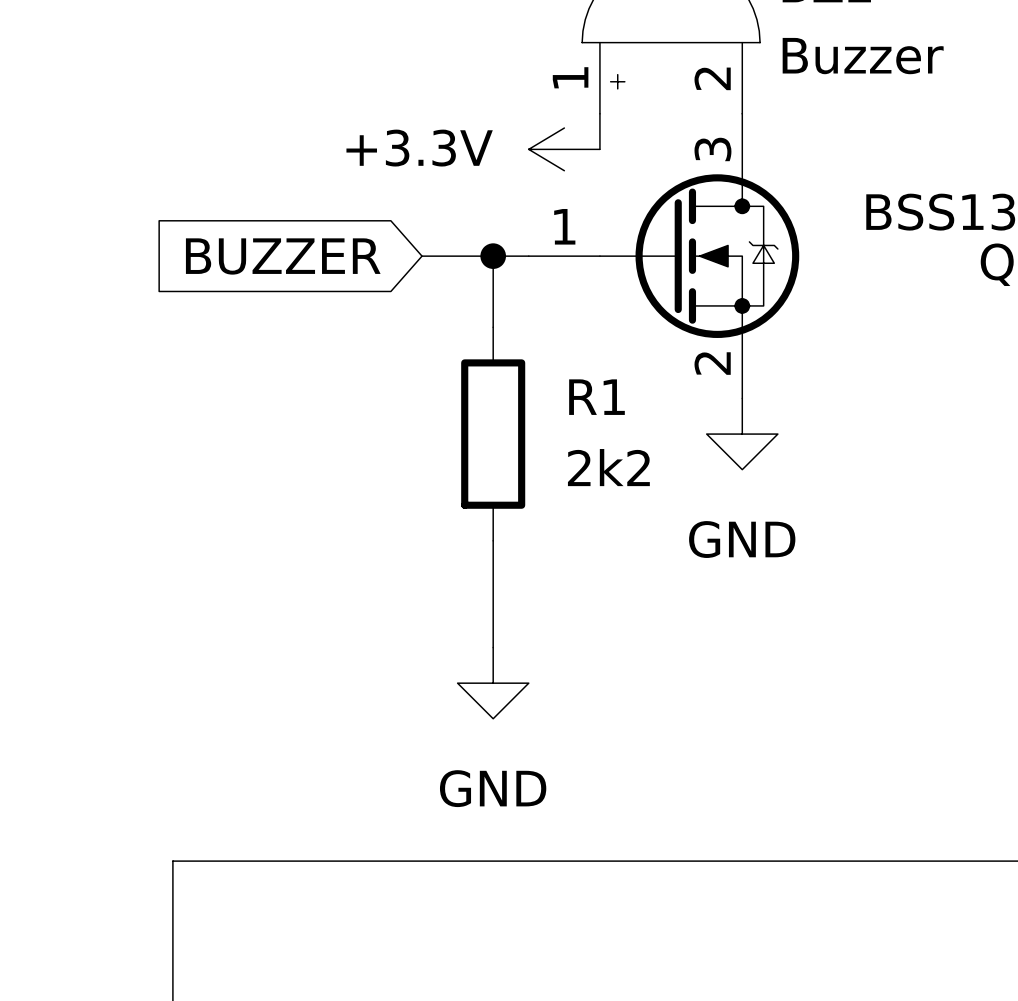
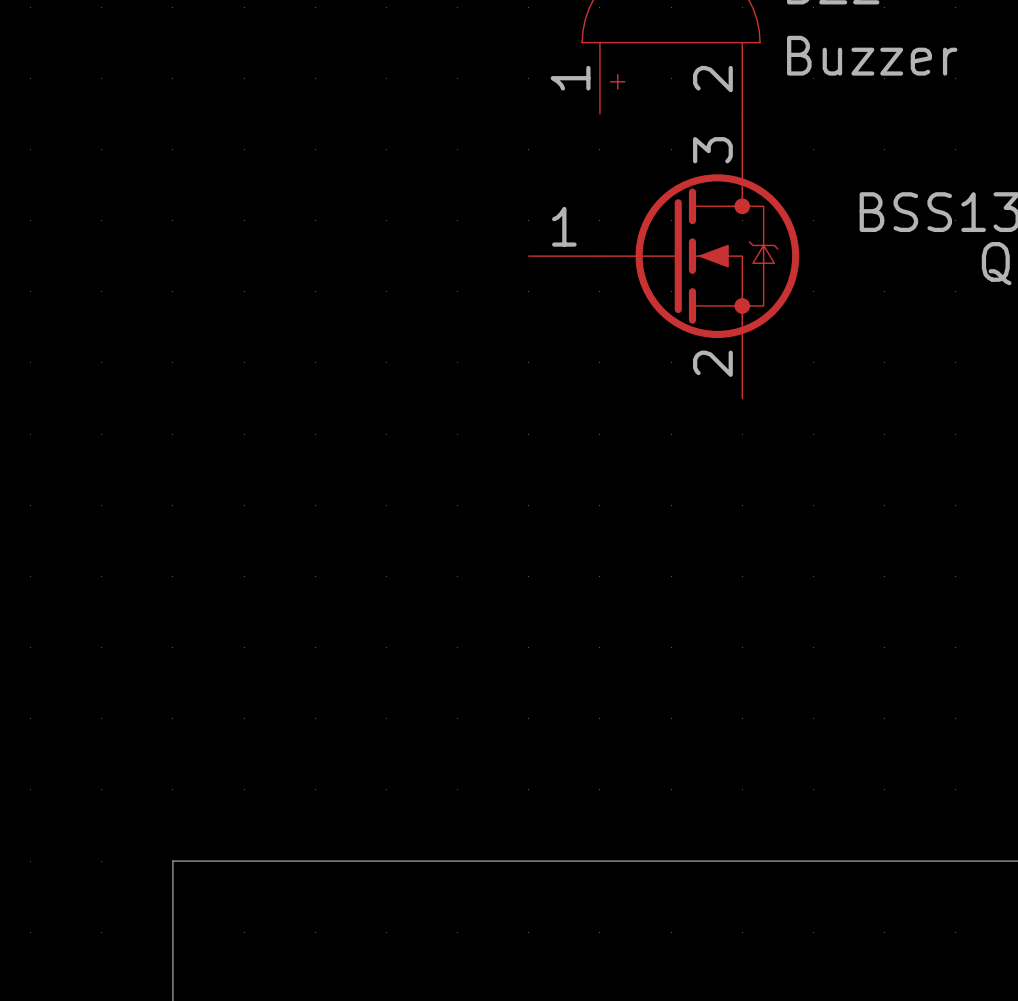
wire: (599, 113) (599, 149) -> none
power symbol: +3.3V (564, 149) -> none
global label: BUZZER (283, 256) -> none
wire: (422, 256) (528, 256) -> none
wire: (493, 256) (493, 327) -> none
junction: (493, 256) -> none
R1: 2k2 (493, 434) -> none
power symbol: GND (742, 434) -> none
wire: (493, 540) (493, 647) -> none
power symbol: GND (493, 683) -> none

